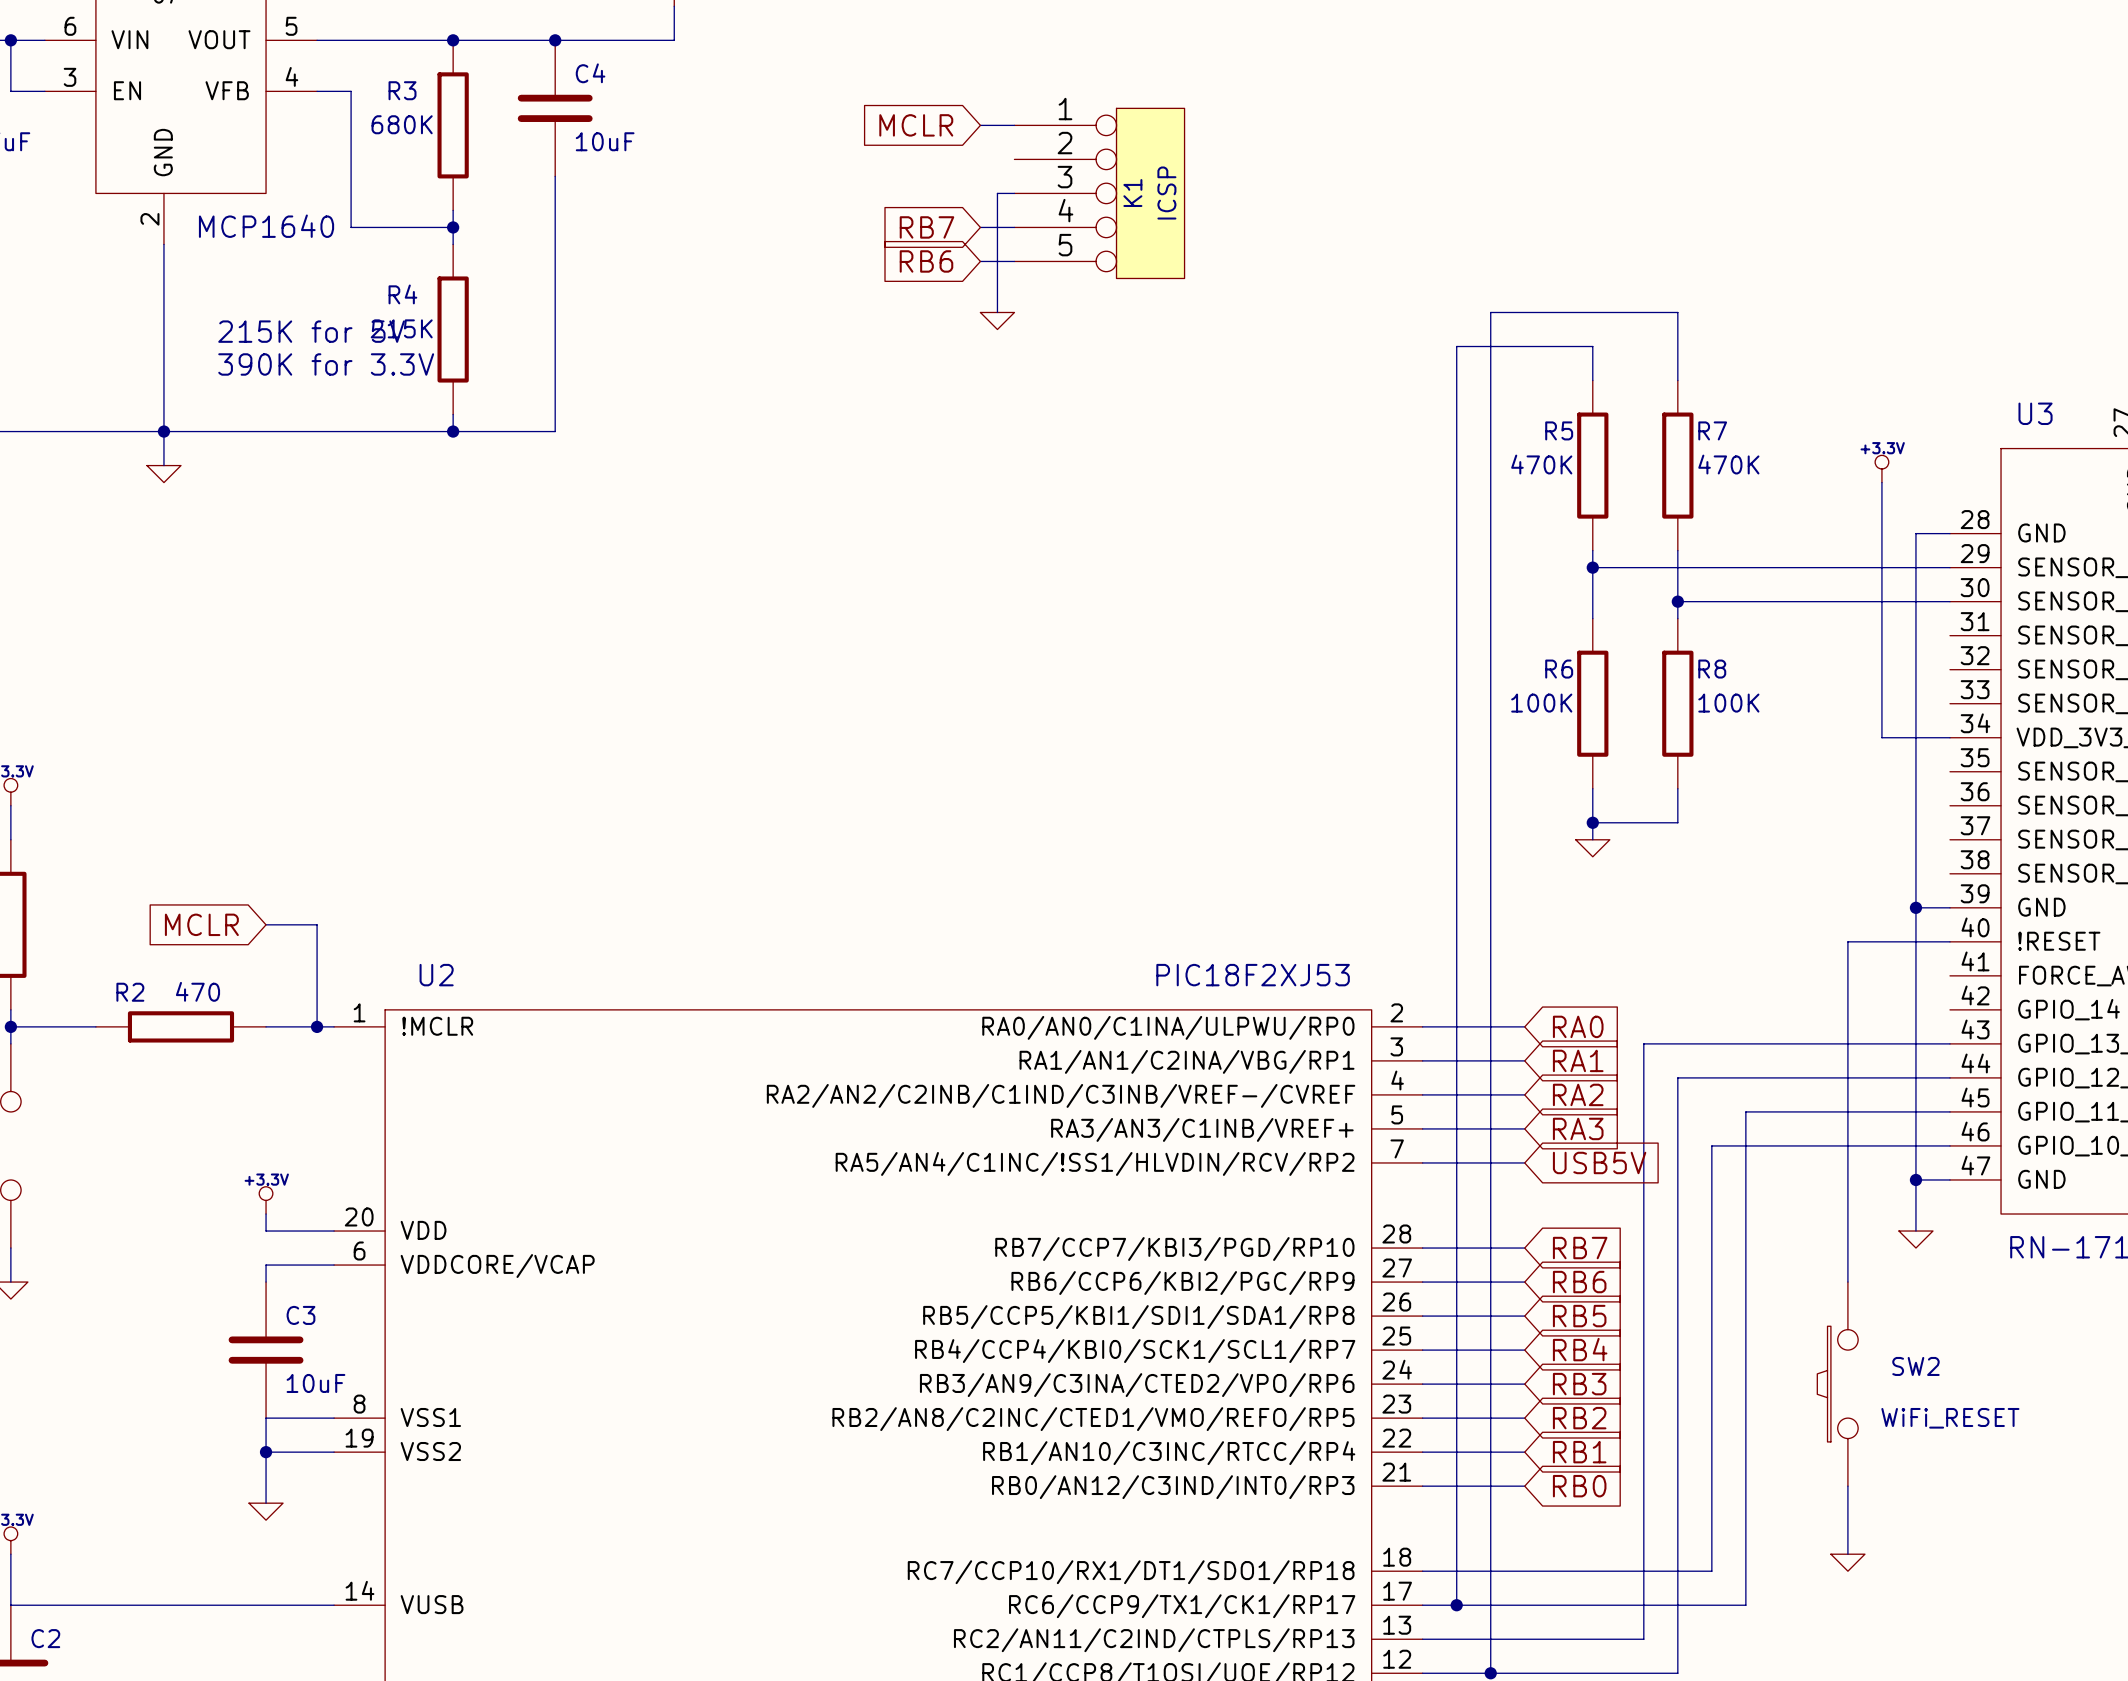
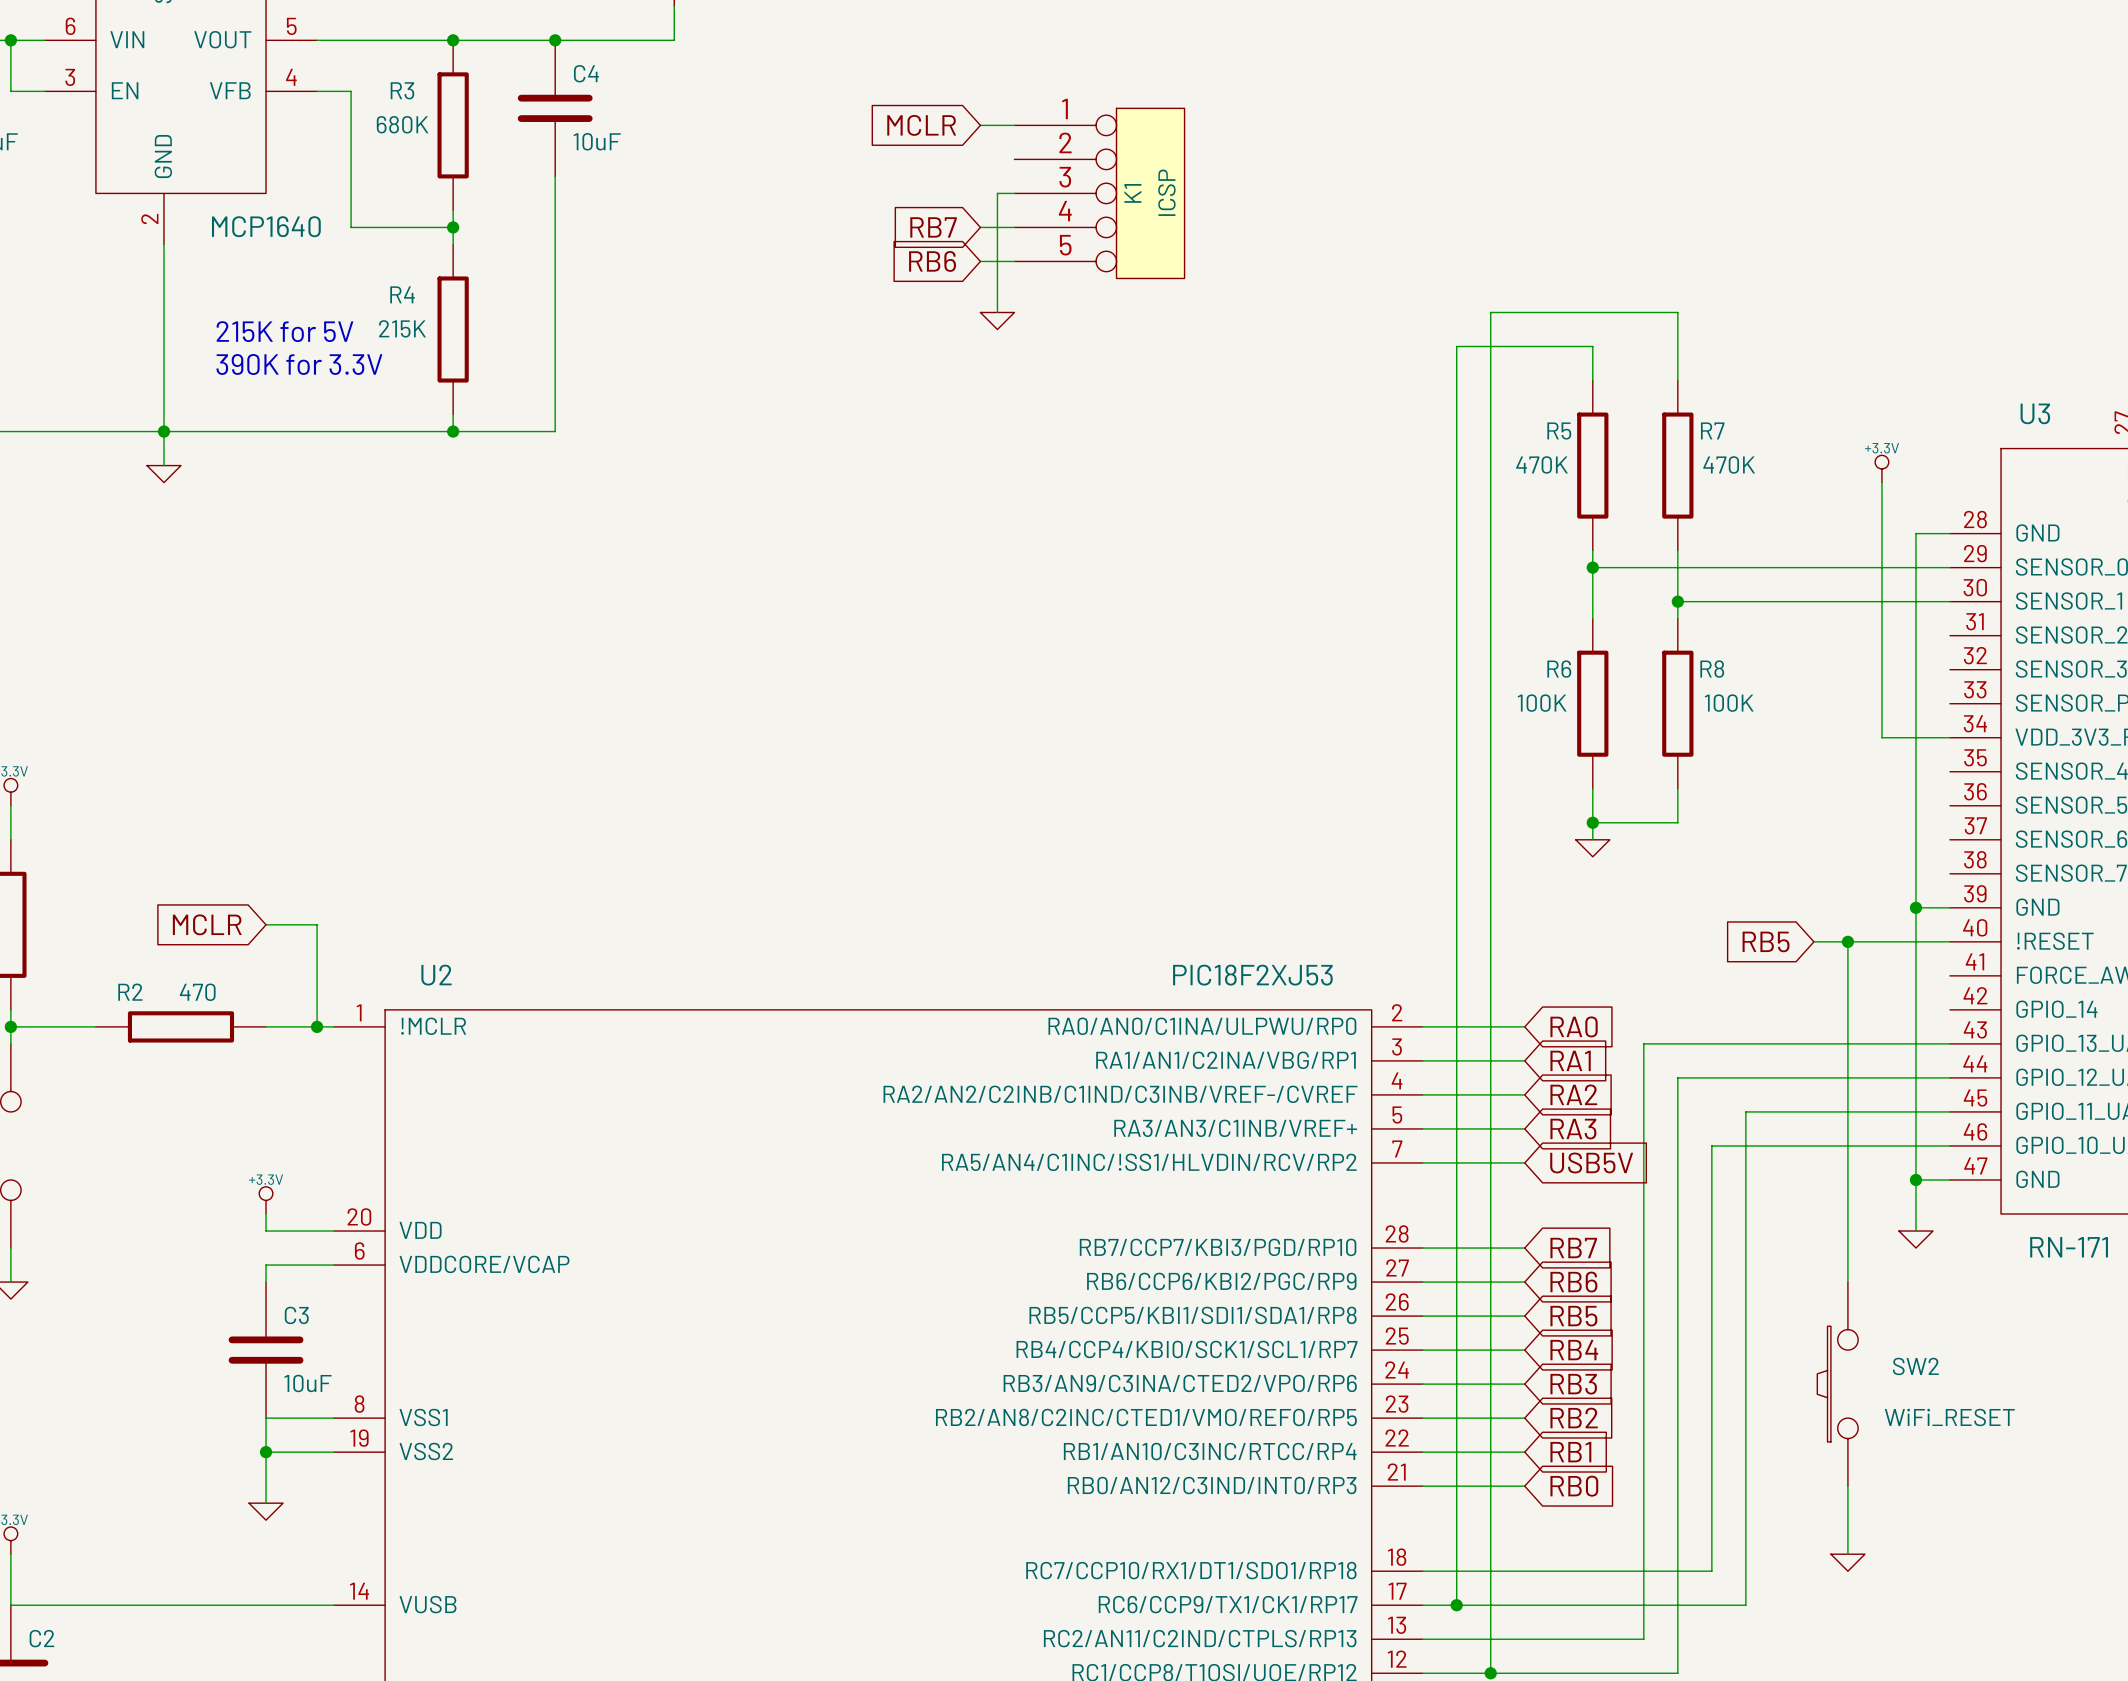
global label: none -> RB5 (1766, 941)
wire: none -> (1813, 941) (1847, 941)
junction: none -> (1847, 941)

